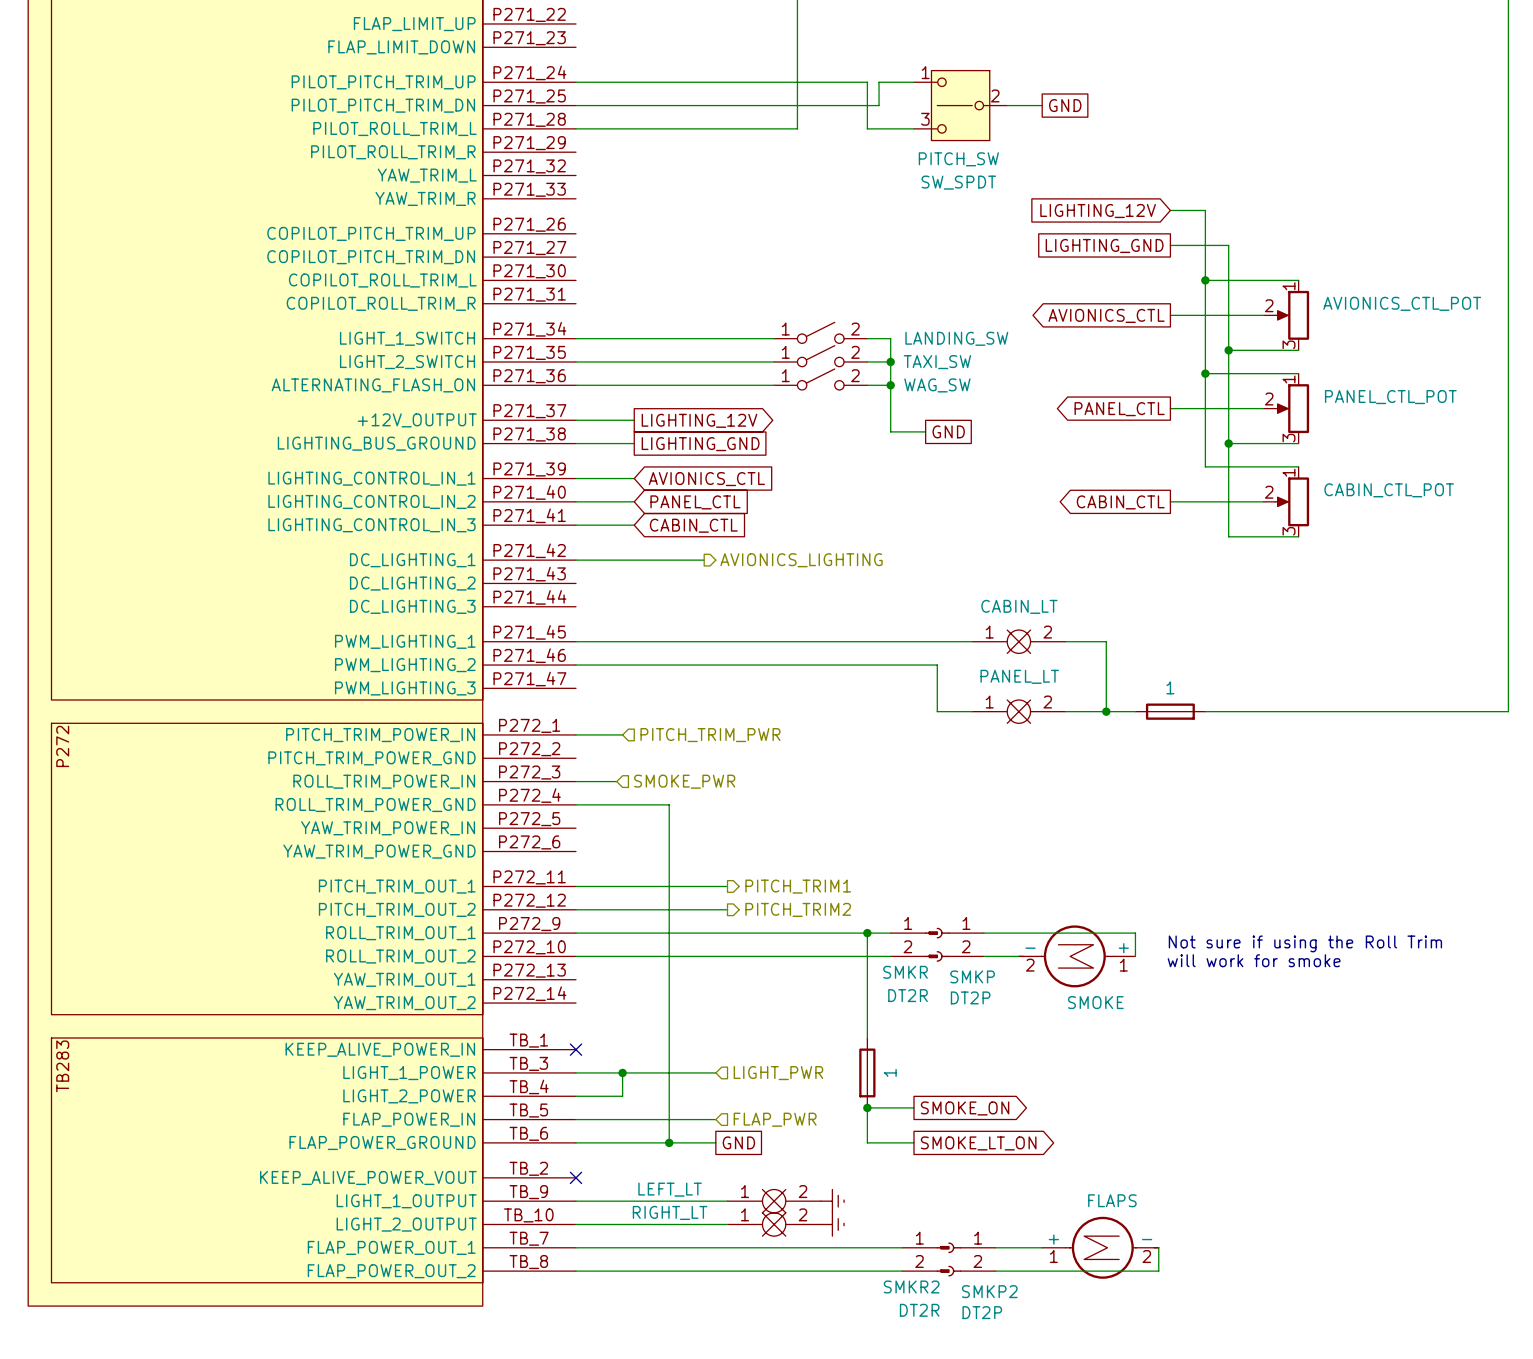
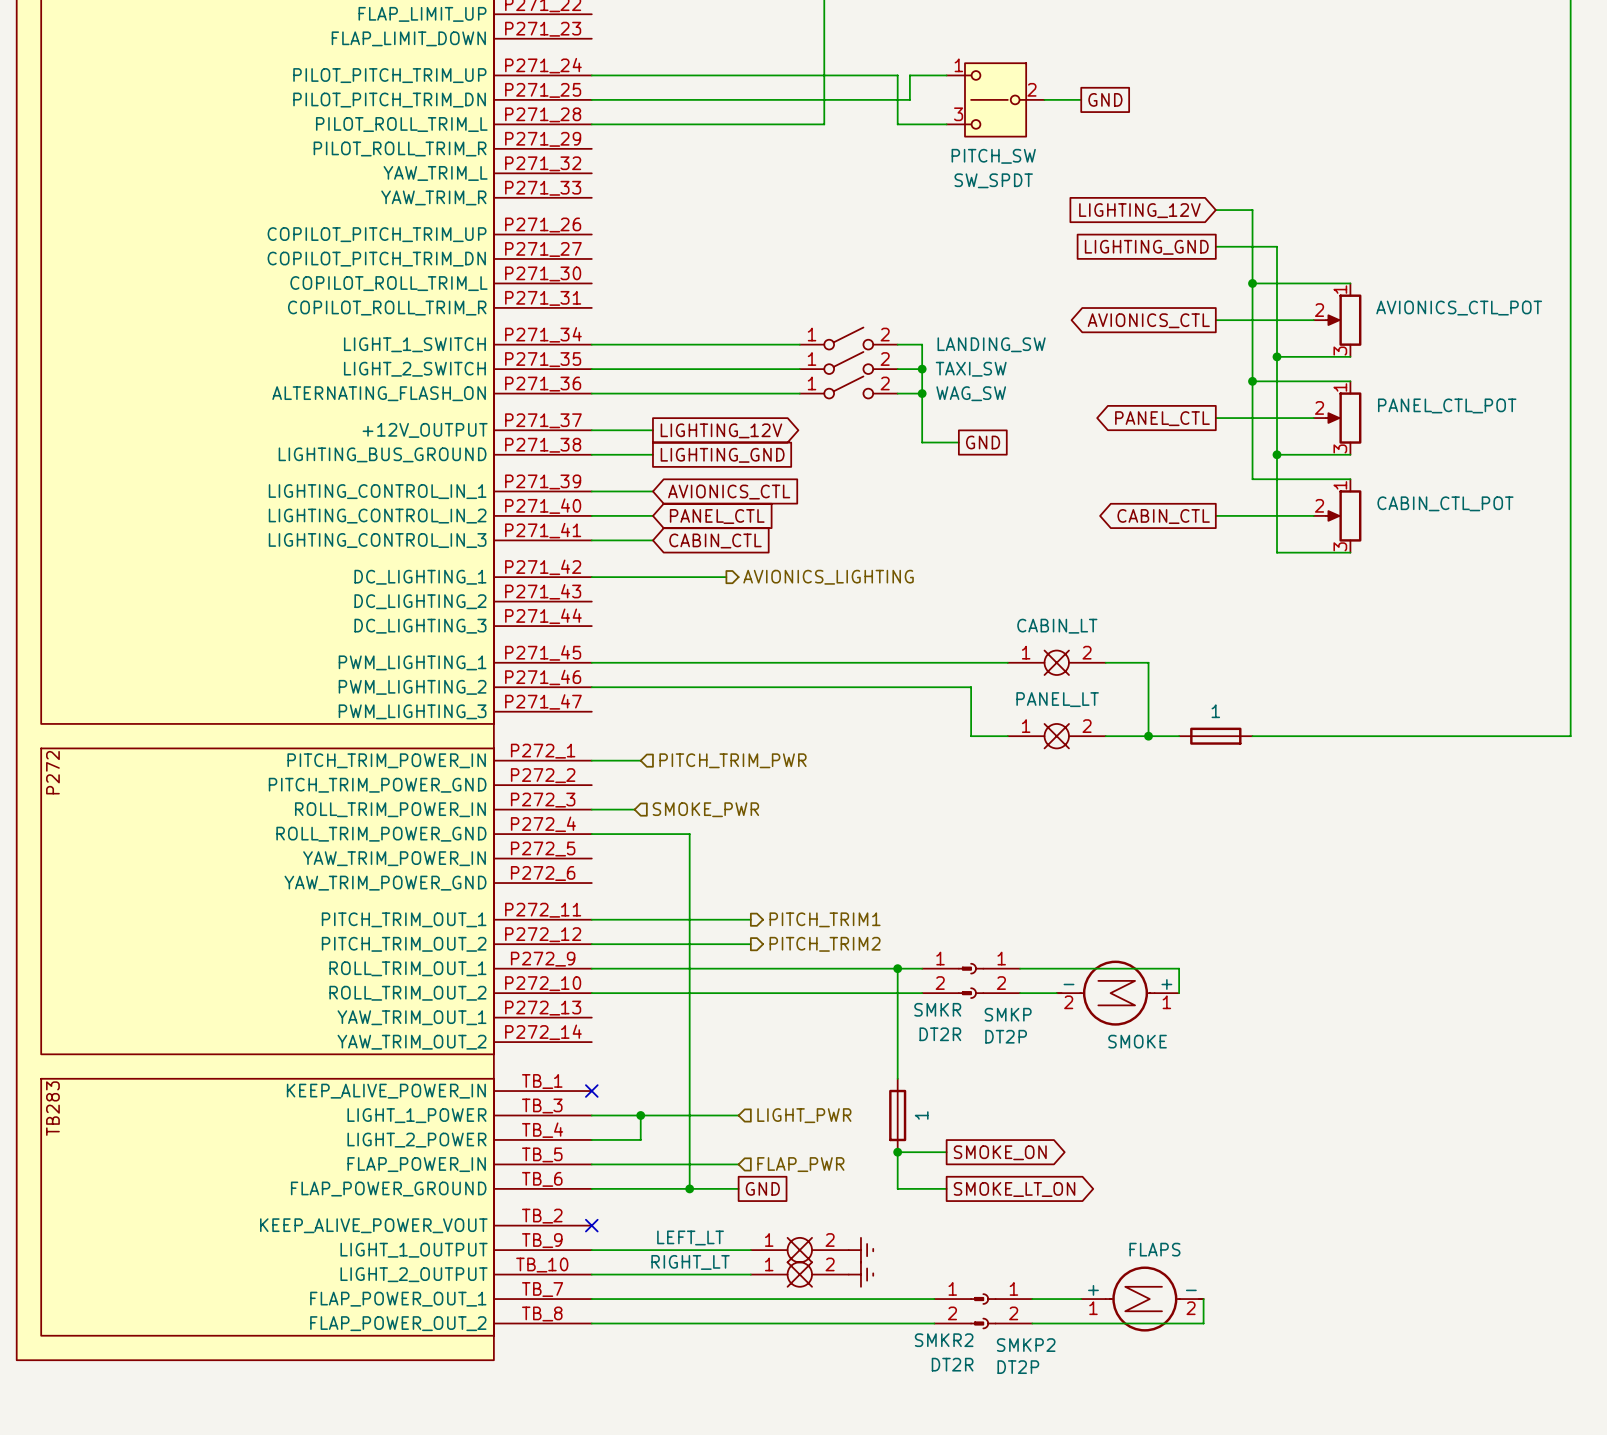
text: Not sure if using the Roll Trim (1305, 943) -> none
text: will work for smoke (1254, 960) -> none

